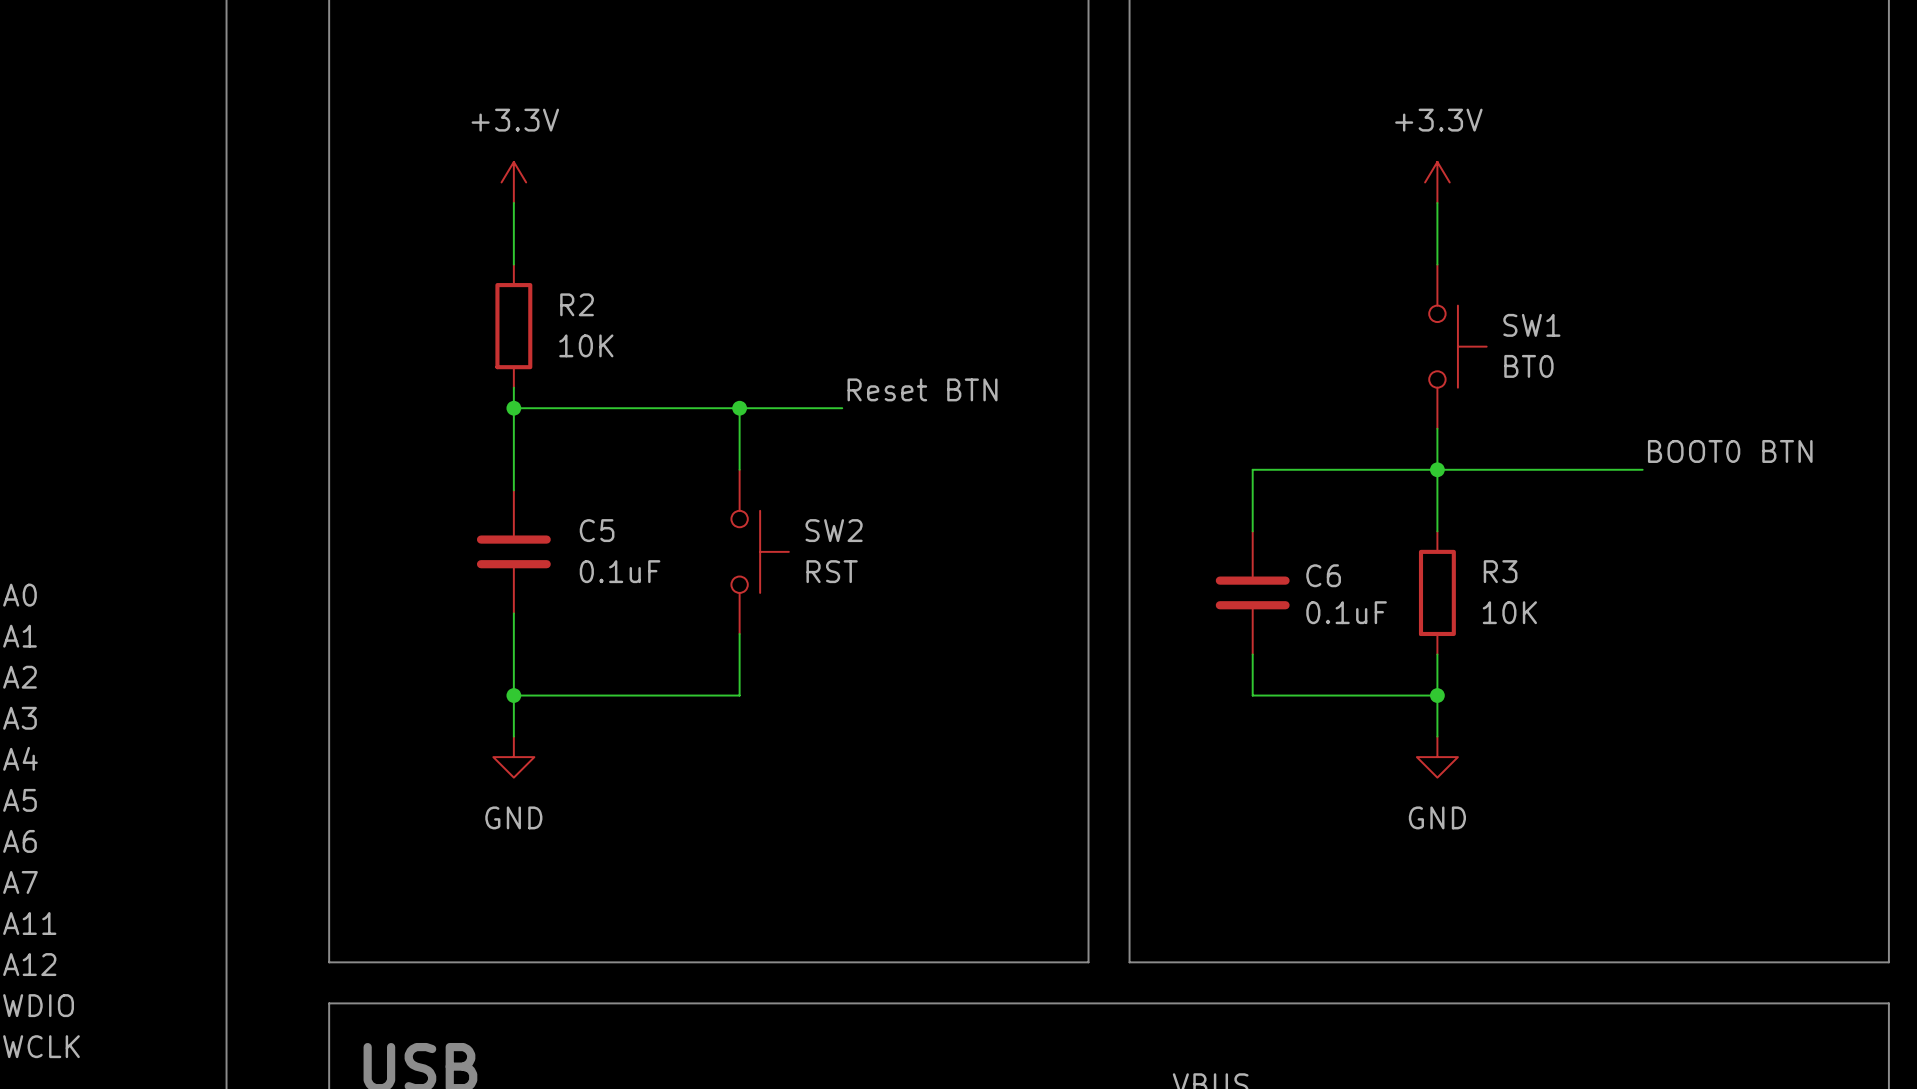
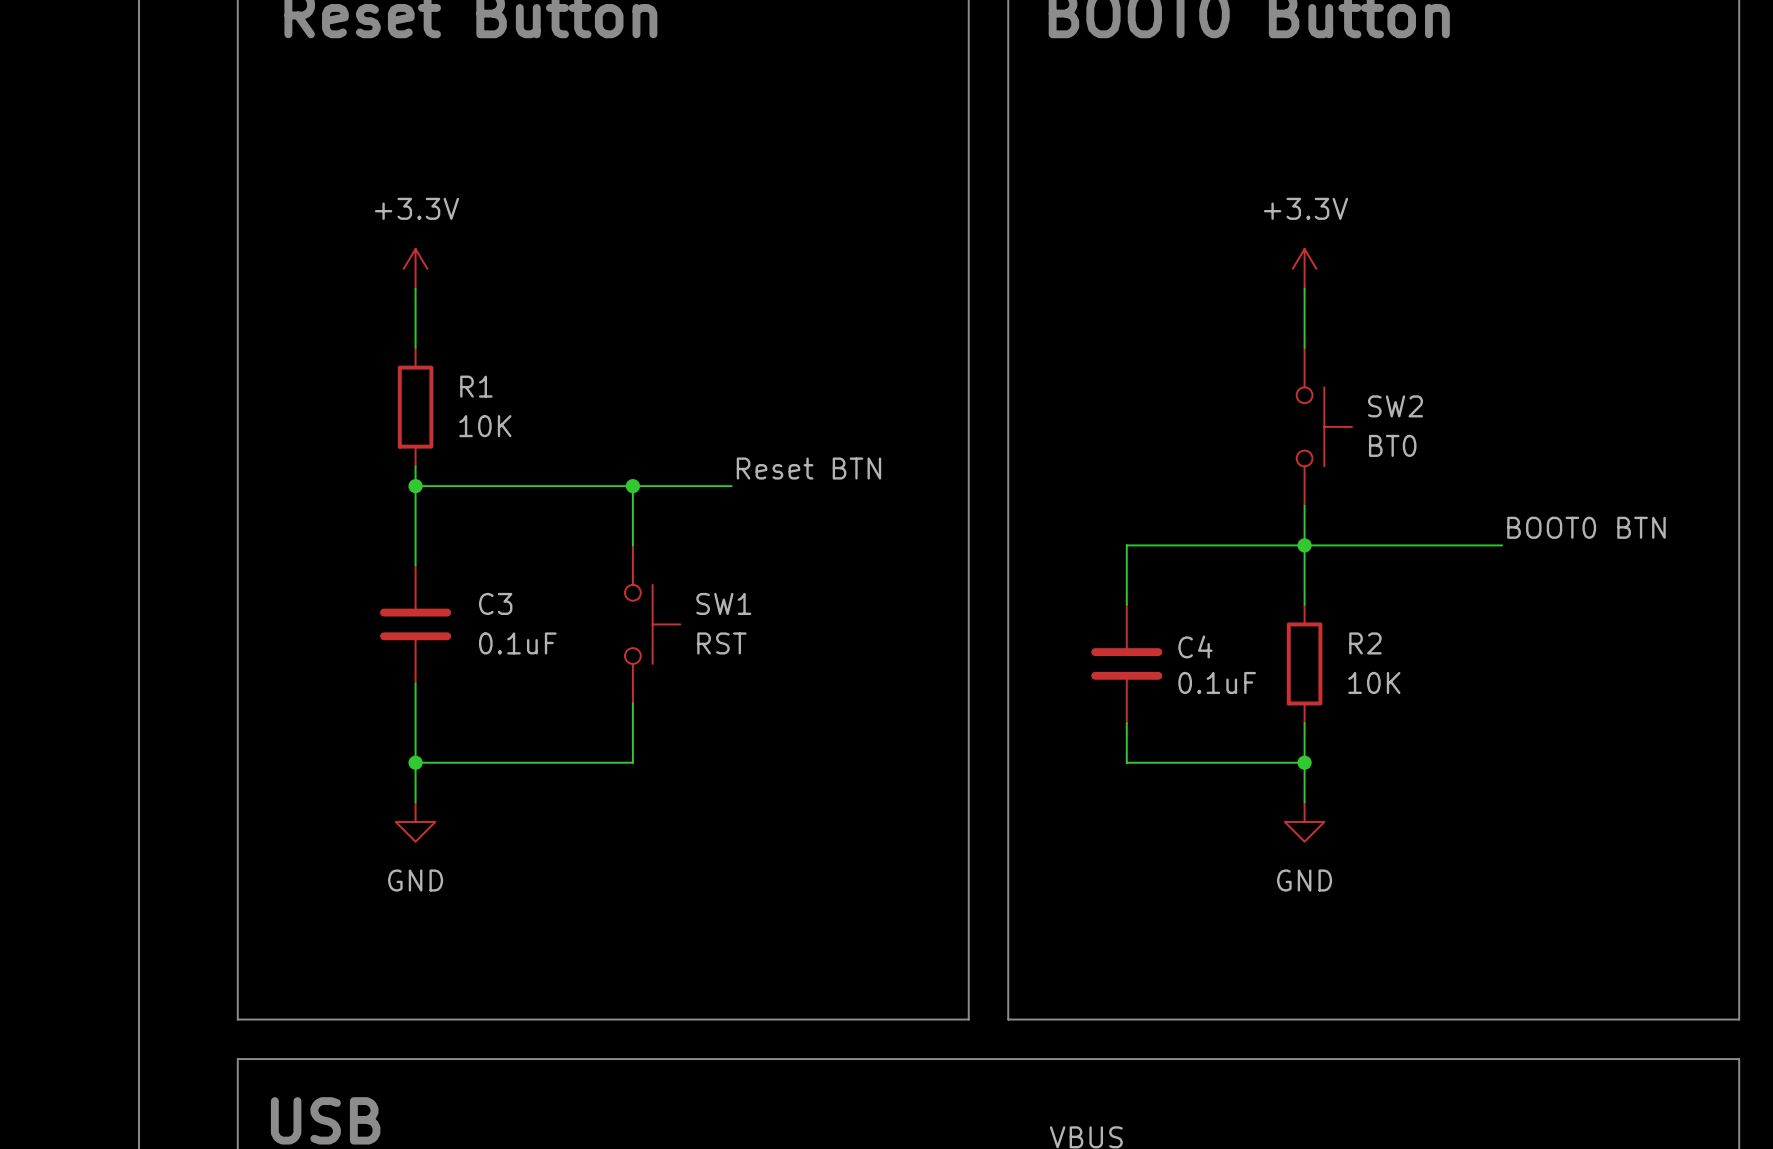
R2 name: R2 (577, 304) -> R1 (476, 386)
SW1 name: SW1 (1531, 325) -> SW2 (1395, 406)
C5 name: C5 (597, 530) -> C3 (495, 603)
SW2 name: SW2 (834, 530) -> SW1 (723, 603)
R3 name: R3 (1500, 571) -> R2 (1365, 643)
C6 name: C6 (1323, 575) -> C4 (1195, 646)

